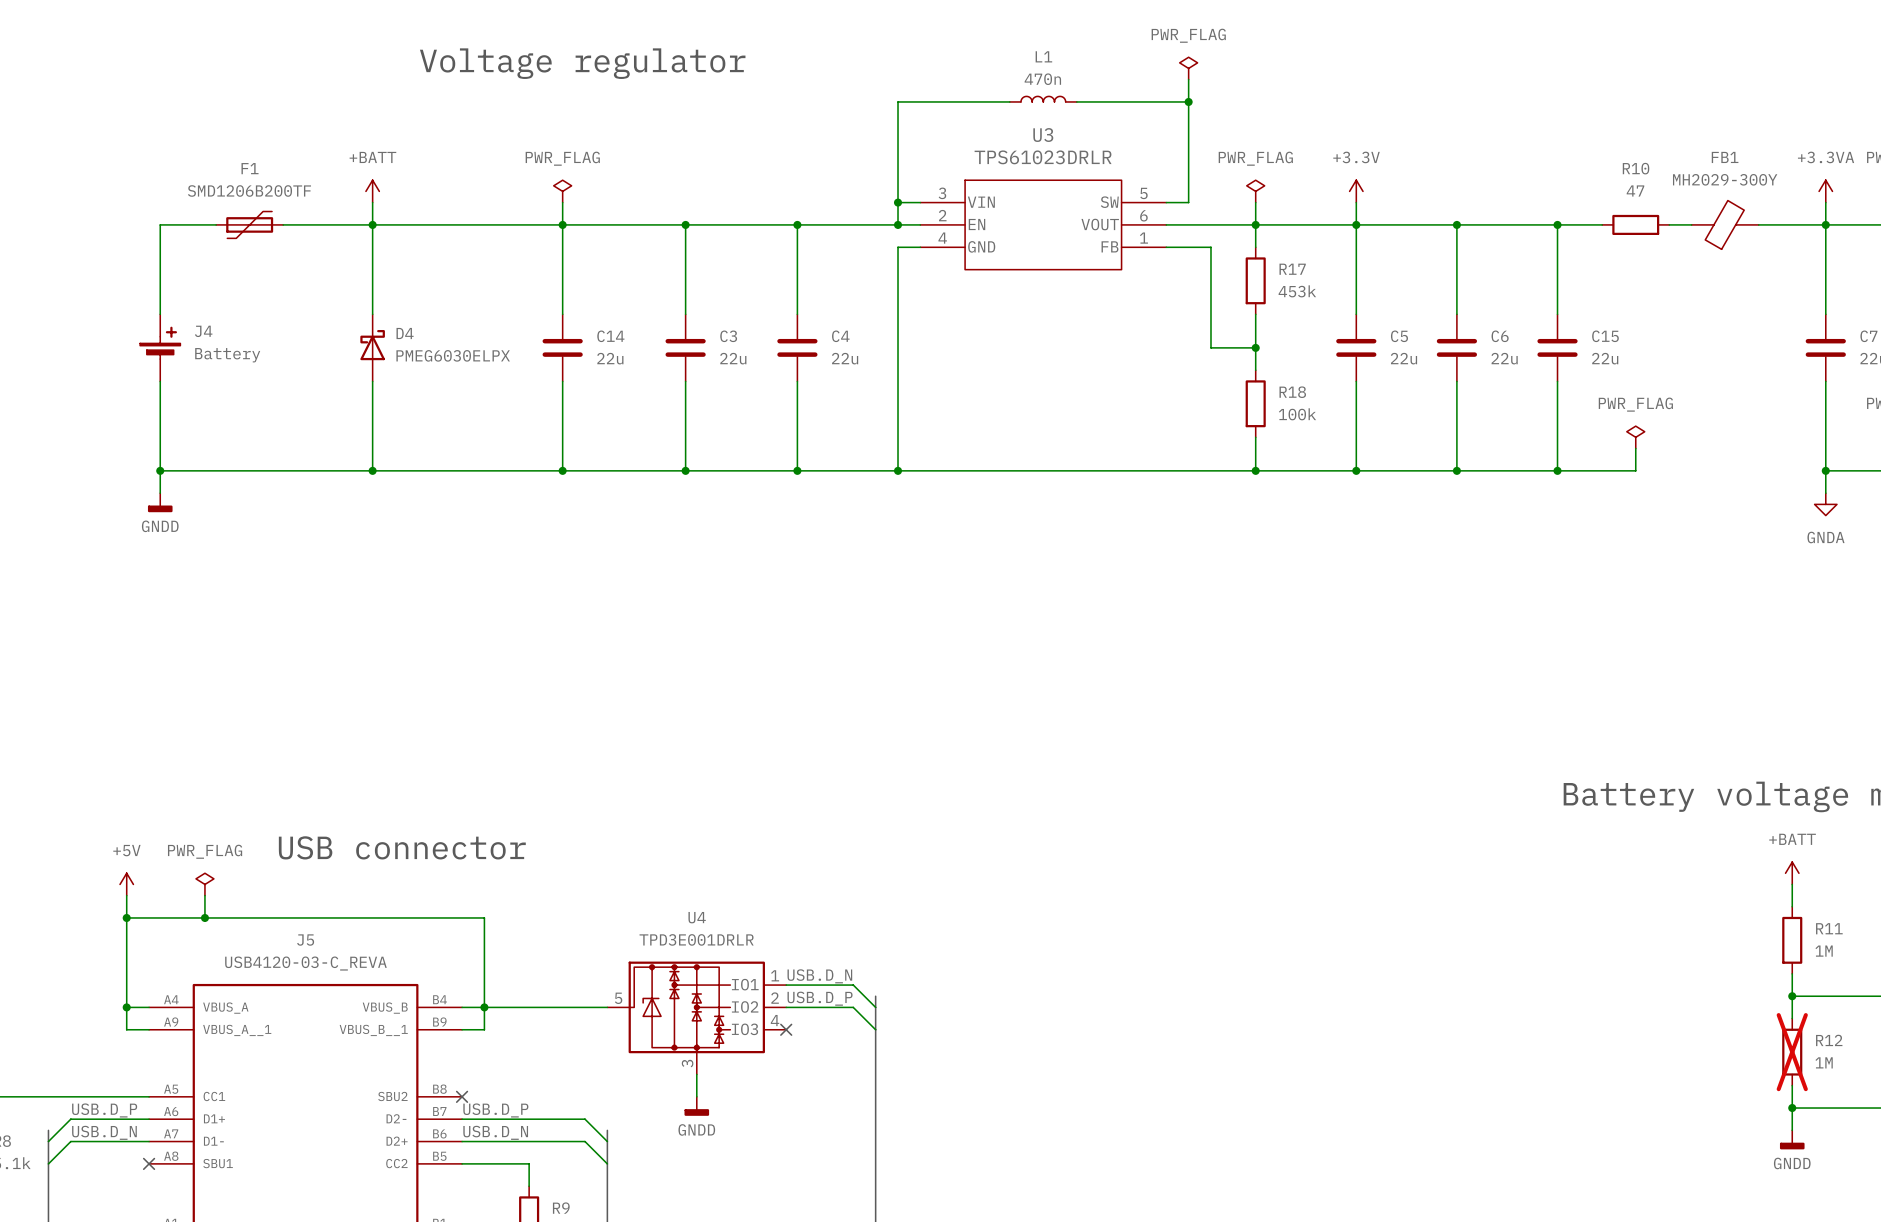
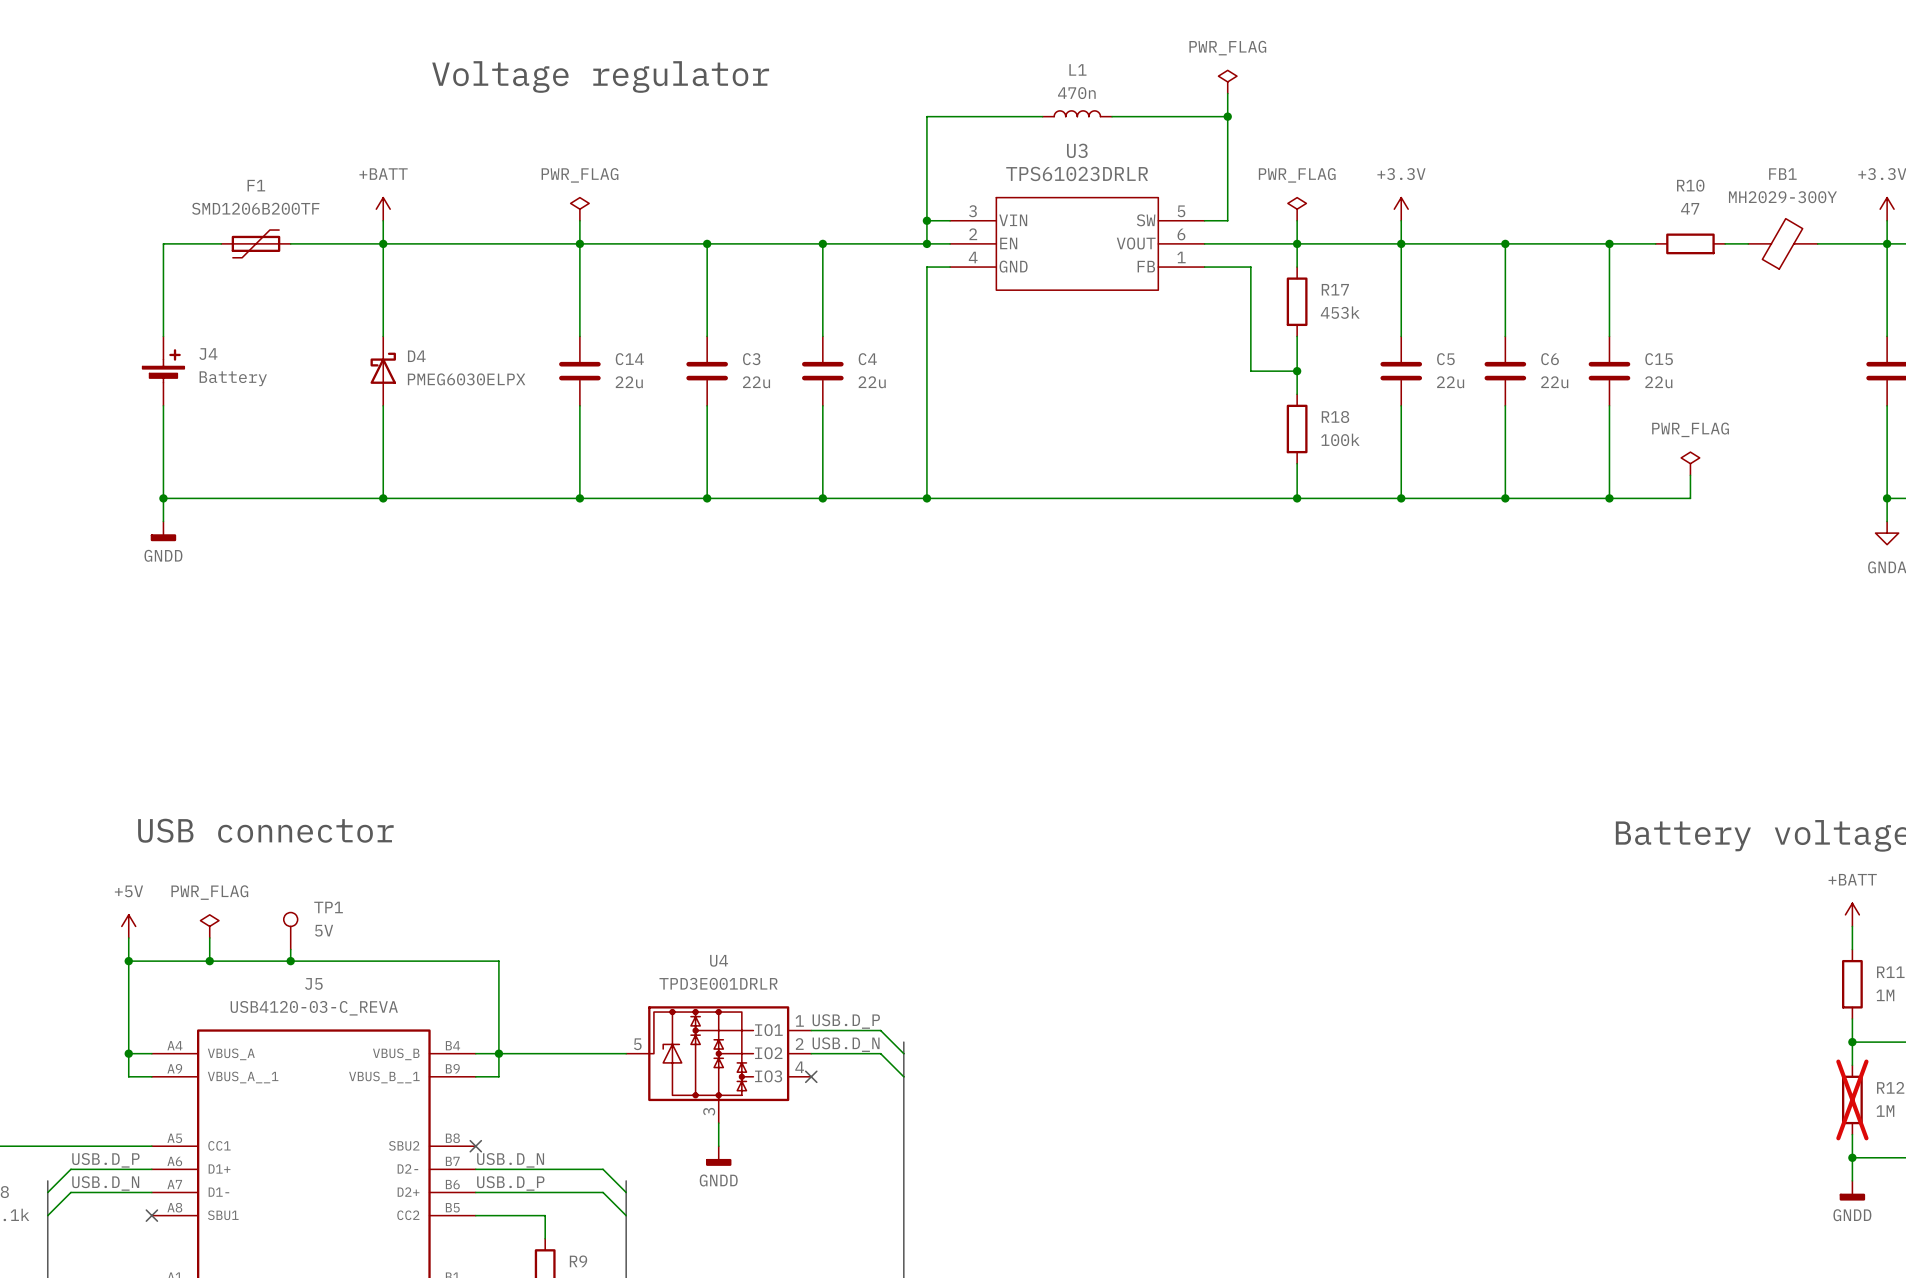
text position: USB connector (402, 847) -> USB connector (265, 830)
TP1: none -> 5V (290, 931)
wire: none -> (290, 949) (290, 961)
junction: none -> (290, 961)
label: USB.D_N (819, 976) -> USB.D_P (846, 1021)
label: USB.D_P (820, 998) -> USB.D_N (846, 1044)
label: USB.D_P (495, 1110) -> USB.D_N (510, 1160)
label: USB.D_N (495, 1132) -> USB.D_P (510, 1183)

